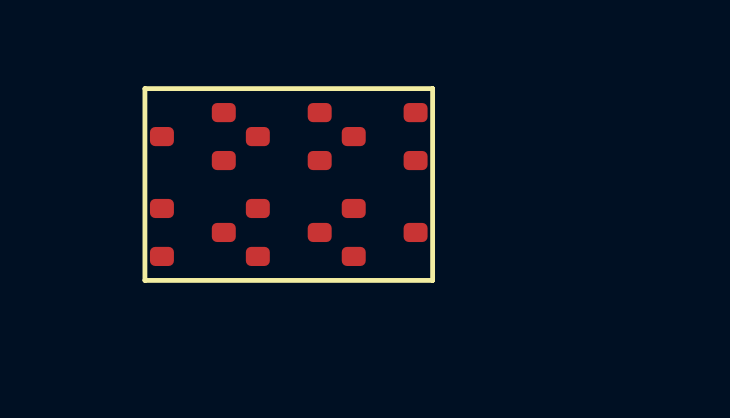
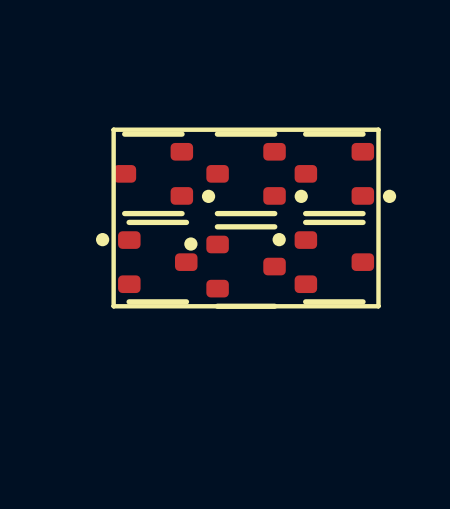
part footprint: [149, 103, 236, 171] -> [113, 131, 216, 217]
part footprint: [245, 103, 332, 171] -> [206, 131, 308, 217]
part footprint: [341, 103, 428, 171] -> [294, 131, 397, 217]
part footprint: [149, 198, 236, 267] -> [95, 219, 198, 305]
part footprint: [245, 198, 332, 267] -> [184, 224, 286, 309]
part footprint: [341, 198, 428, 267] -> [272, 219, 375, 305]

